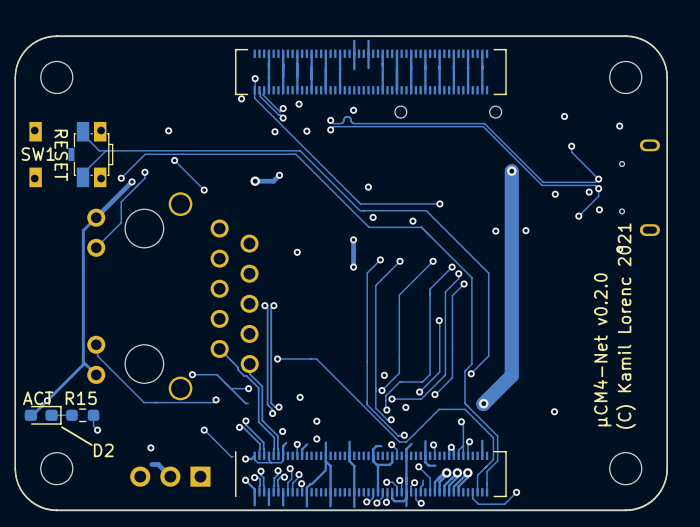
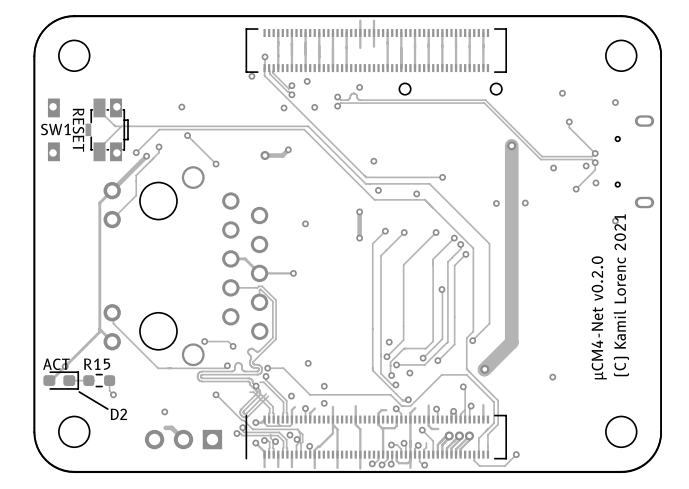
track: none -> (230, 258) (245, 258) (259, 273) (293, 273)
via: none -> (293, 273)
track: (264, 305) (267, 308) (267, 404) (272, 409) (272, 413) -> none
via: (264, 305) -> none
track: (273, 305) (271, 308) (271, 403) (275, 407) (278, 407) -> none
via: (273, 305) -> none
track: none -> (230, 287) (262, 286) (276, 300) (276, 339) (253, 362) (261, 367) (259, 374) (202, 374) (200, 376) (251, 379) (260, 393) (243, 411) (244, 414) (266, 394)
track: none -> (259, 302) (260, 289) (272, 301) (272, 337) (259, 351) (251, 348) (248, 350) (251, 357) (250, 365) (258, 368) (258, 370) (243, 371) (241, 364) (238, 363) (232, 371) (201, 371) (197, 376) (202, 381) (249, 381) (257, 392) (240, 409) (240, 413) (243, 417) (248, 416) (268, 396)
track: (219, 348) (244, 375) (246, 375) (258, 388) (258, 421) (274, 437) (274, 449) -> (260, 382) (263, 382) (283, 402) (283, 413)
track: (277, 359) (316, 359) (399, 441) -> (268, 368) (283, 368) (310, 394) (390, 394) (403, 406)
via: (277, 359) -> none
track: (244, 369) (249, 364) (249, 373) (262, 386) (262, 420) (277, 436) (277, 449) -> (266, 376) (266, 380) (286, 400) (286, 413)
track: (222, 379) (247, 403) -> none
via: none -> (233, 346)
track: (224, 382) (230, 388) (248, 388) -> none
via: (248, 388) -> none
via: none -> (267, 368)
via: (278, 407) -> none
via: none -> (266, 376)
via: (272, 413) -> none
via: (239, 427) -> none
via: none -> (242, 427)
via: (290, 468) -> none
via: none -> (236, 433)
track: (278, 470) (278, 474) (274, 478) (274, 485) -> (236, 433) (242, 435) (277, 435) (283, 441) (283, 448)
via: (278, 470) -> none
via: (260, 471) -> none
via: none -> (289, 435)
track: (299, 474) (292, 483) -> (243, 420) (252, 429) (297, 429) (302, 434) (301, 446)
via: (299, 474) -> none
via: none -> (297, 439)
track: (284, 477) (277, 479) (277, 485) -> (242, 427) (243, 432) (279, 432) (286, 439) (286, 448)
via: (284, 477) -> none
via: none -> (275, 441)

